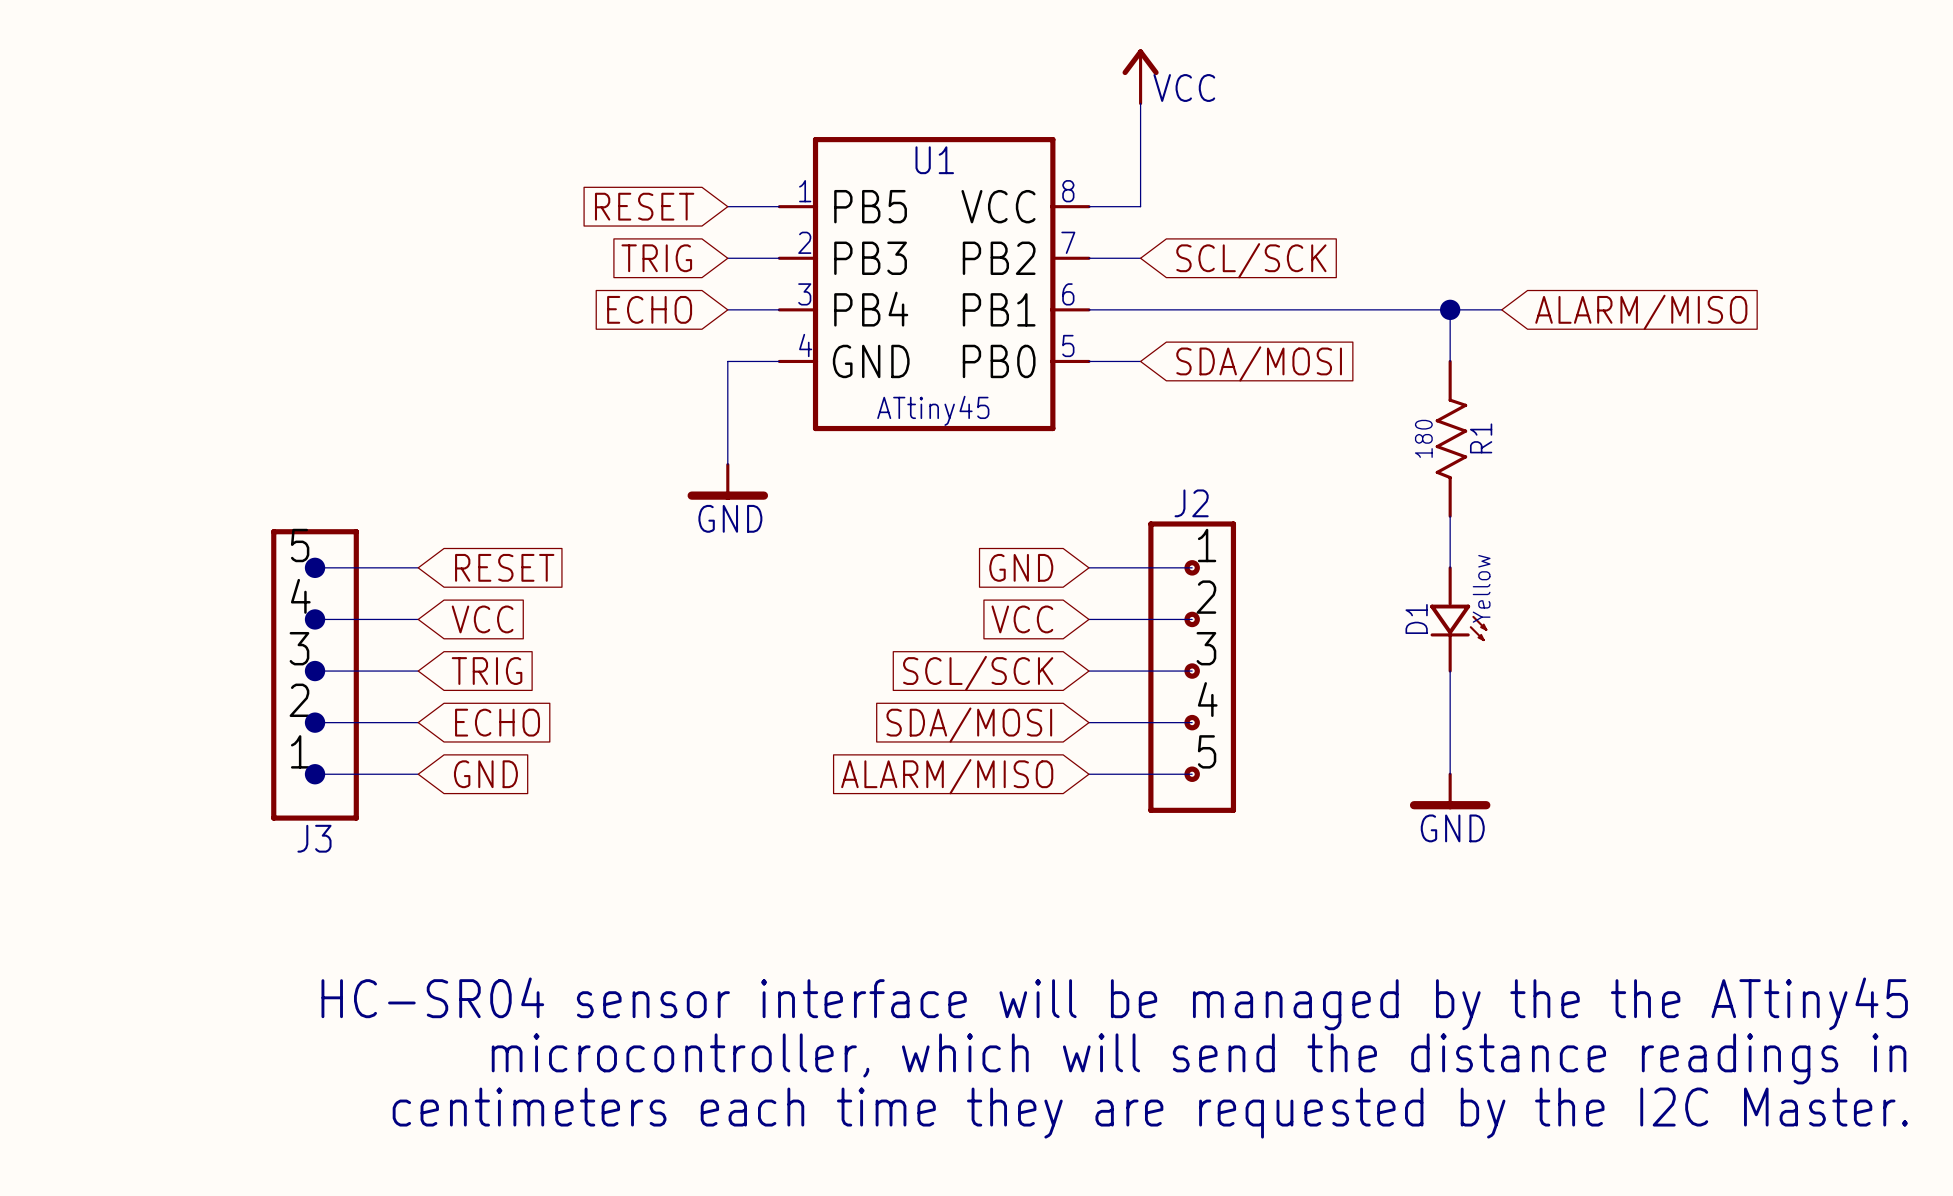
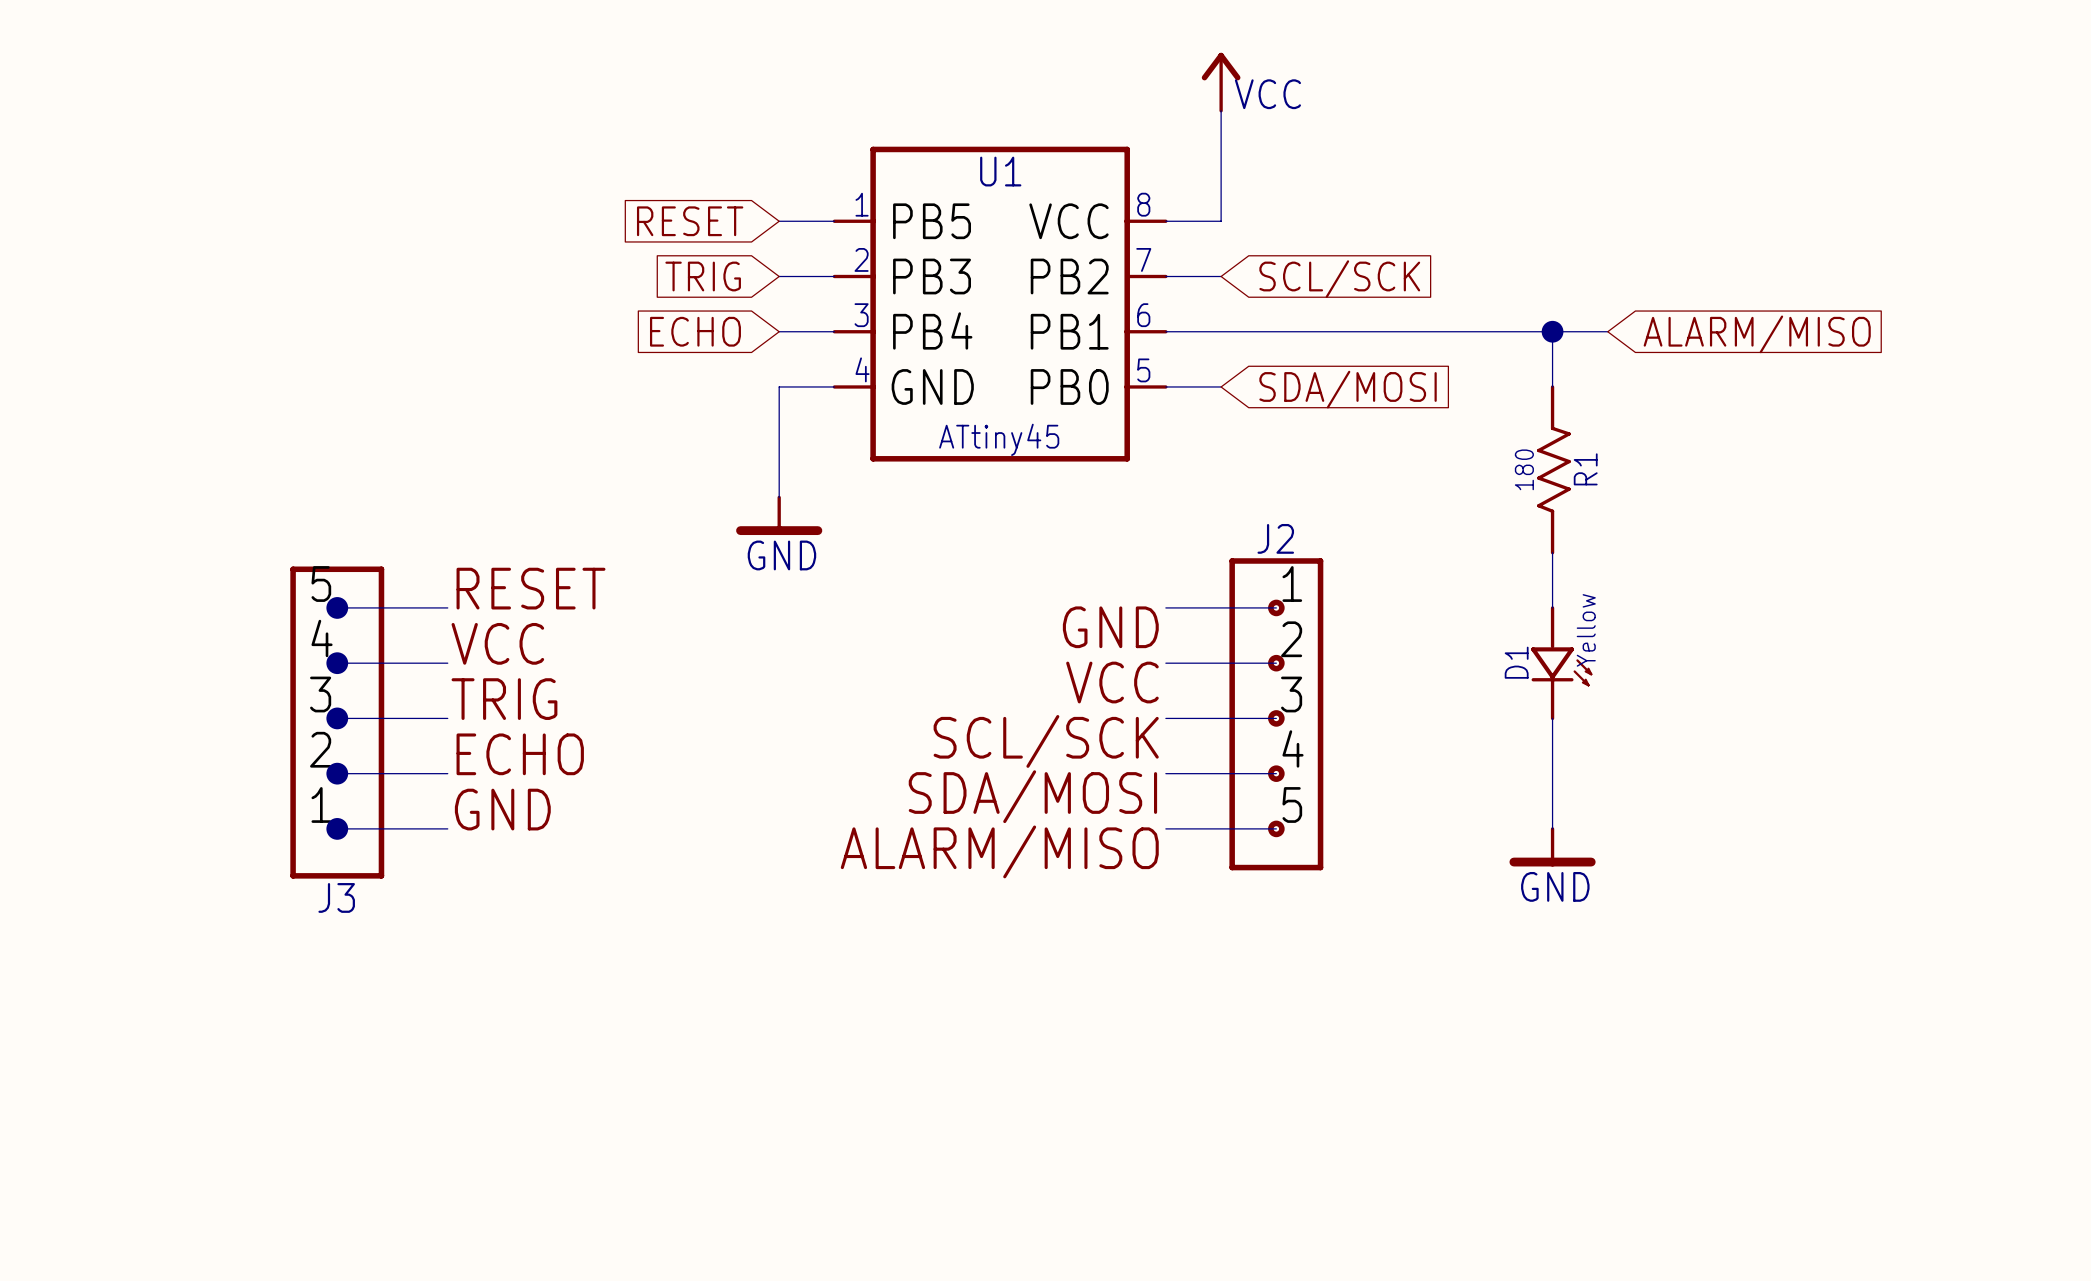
label: none -> RESET (530, 588)
global label: RESET (504, 567) -> none
global label: GND (1021, 567) -> none
label: none -> GND (1110, 627)
label: none -> VCC (497, 643)
global label: VCC (482, 619) -> none
global label: VCC (1022, 619) -> none
label: none -> VCC (1112, 682)
label: none -> TRIG (504, 699)
global label: TRIG (487, 671) -> none
global label: SCL/SCK (978, 673) -> none
label: none -> SCL/SCK (1046, 741)
label: none -> ECHO (520, 754)
global label: ECHO (497, 722) -> none
global label: SDA/MOSI (969, 725) -> none
label: none -> SDA/MOSI (1032, 796)
label: none -> GND (502, 809)
global label: GND (485, 774) -> none
global label: ALARM/MISO (947, 776) -> none
label: none -> ALARM/MISO (999, 851)
text: HC-SR04 sensor interface will be managed by the the ATtiny45 (1114, 1003) -> none
text: microcontroller, which will send the distance readings in (1199, 1058) -> none
text: centimeters each time they are requested by the I2C Master. (1150, 1113) -> none

